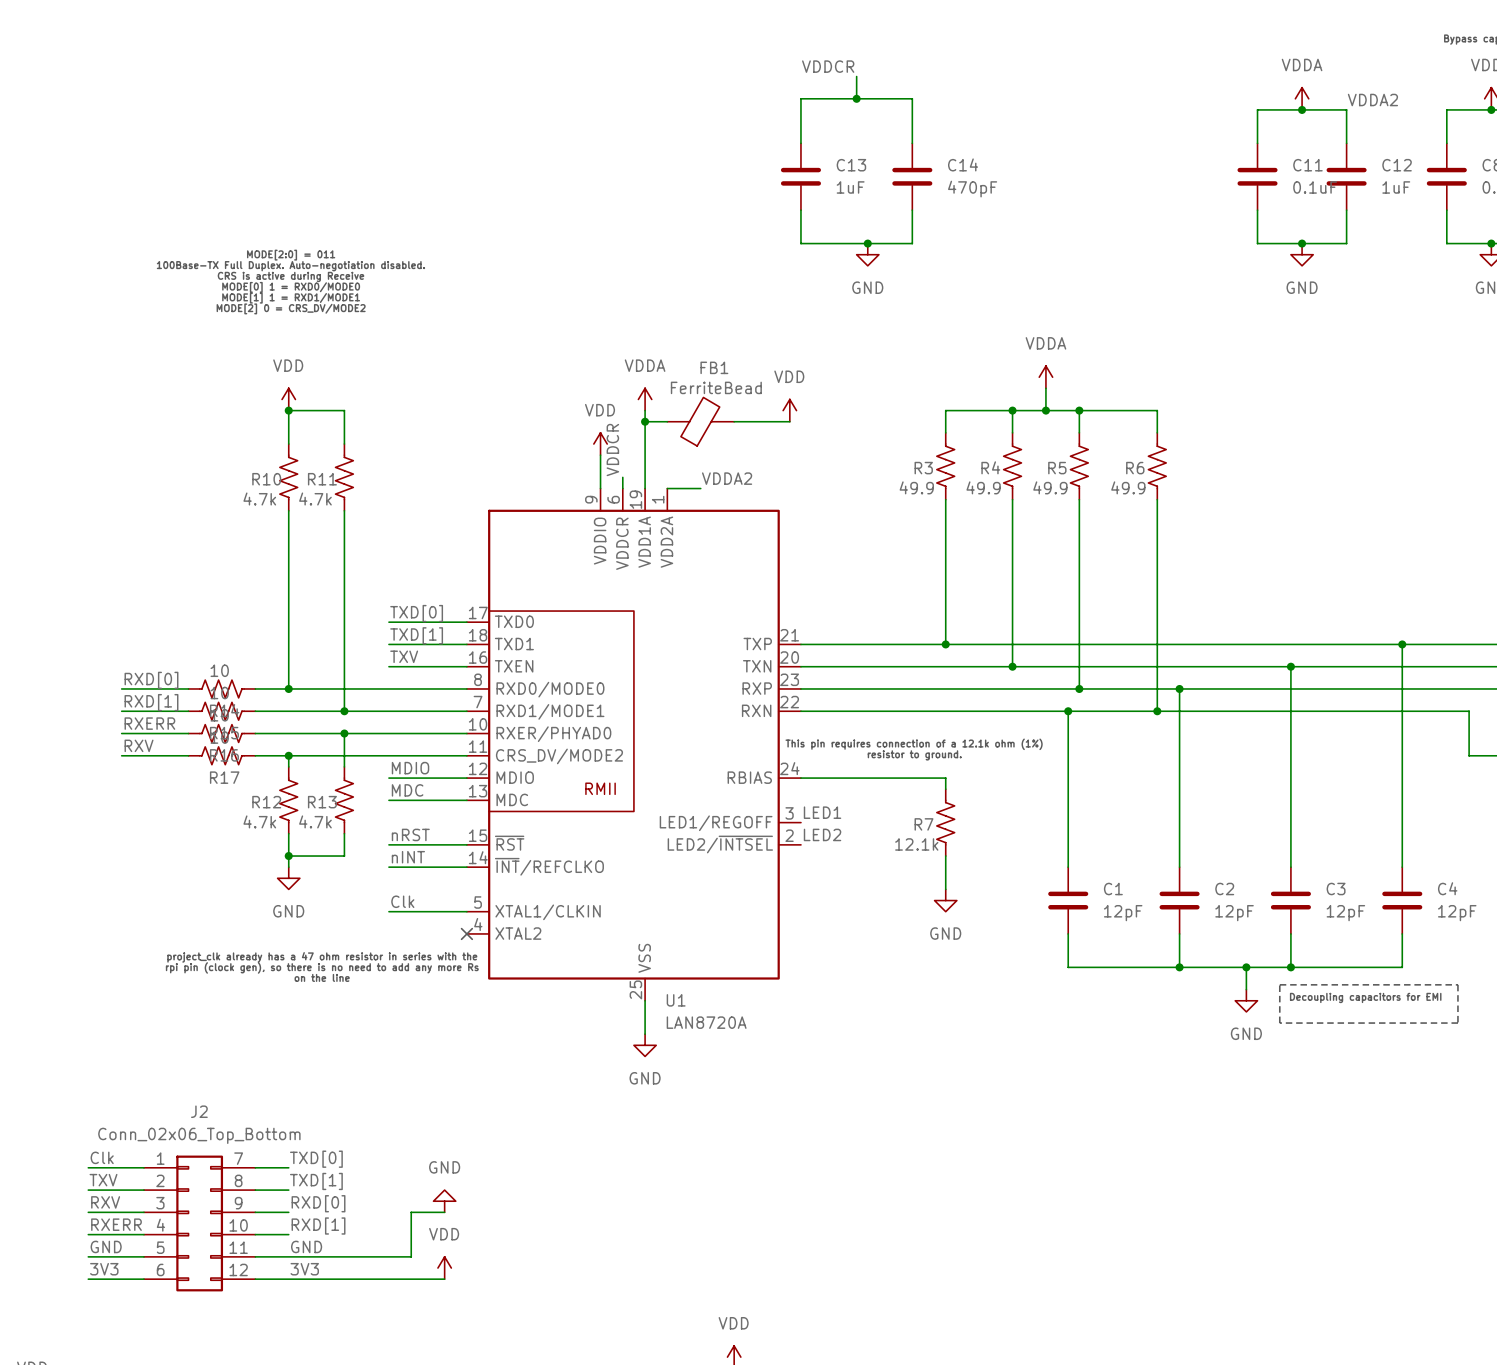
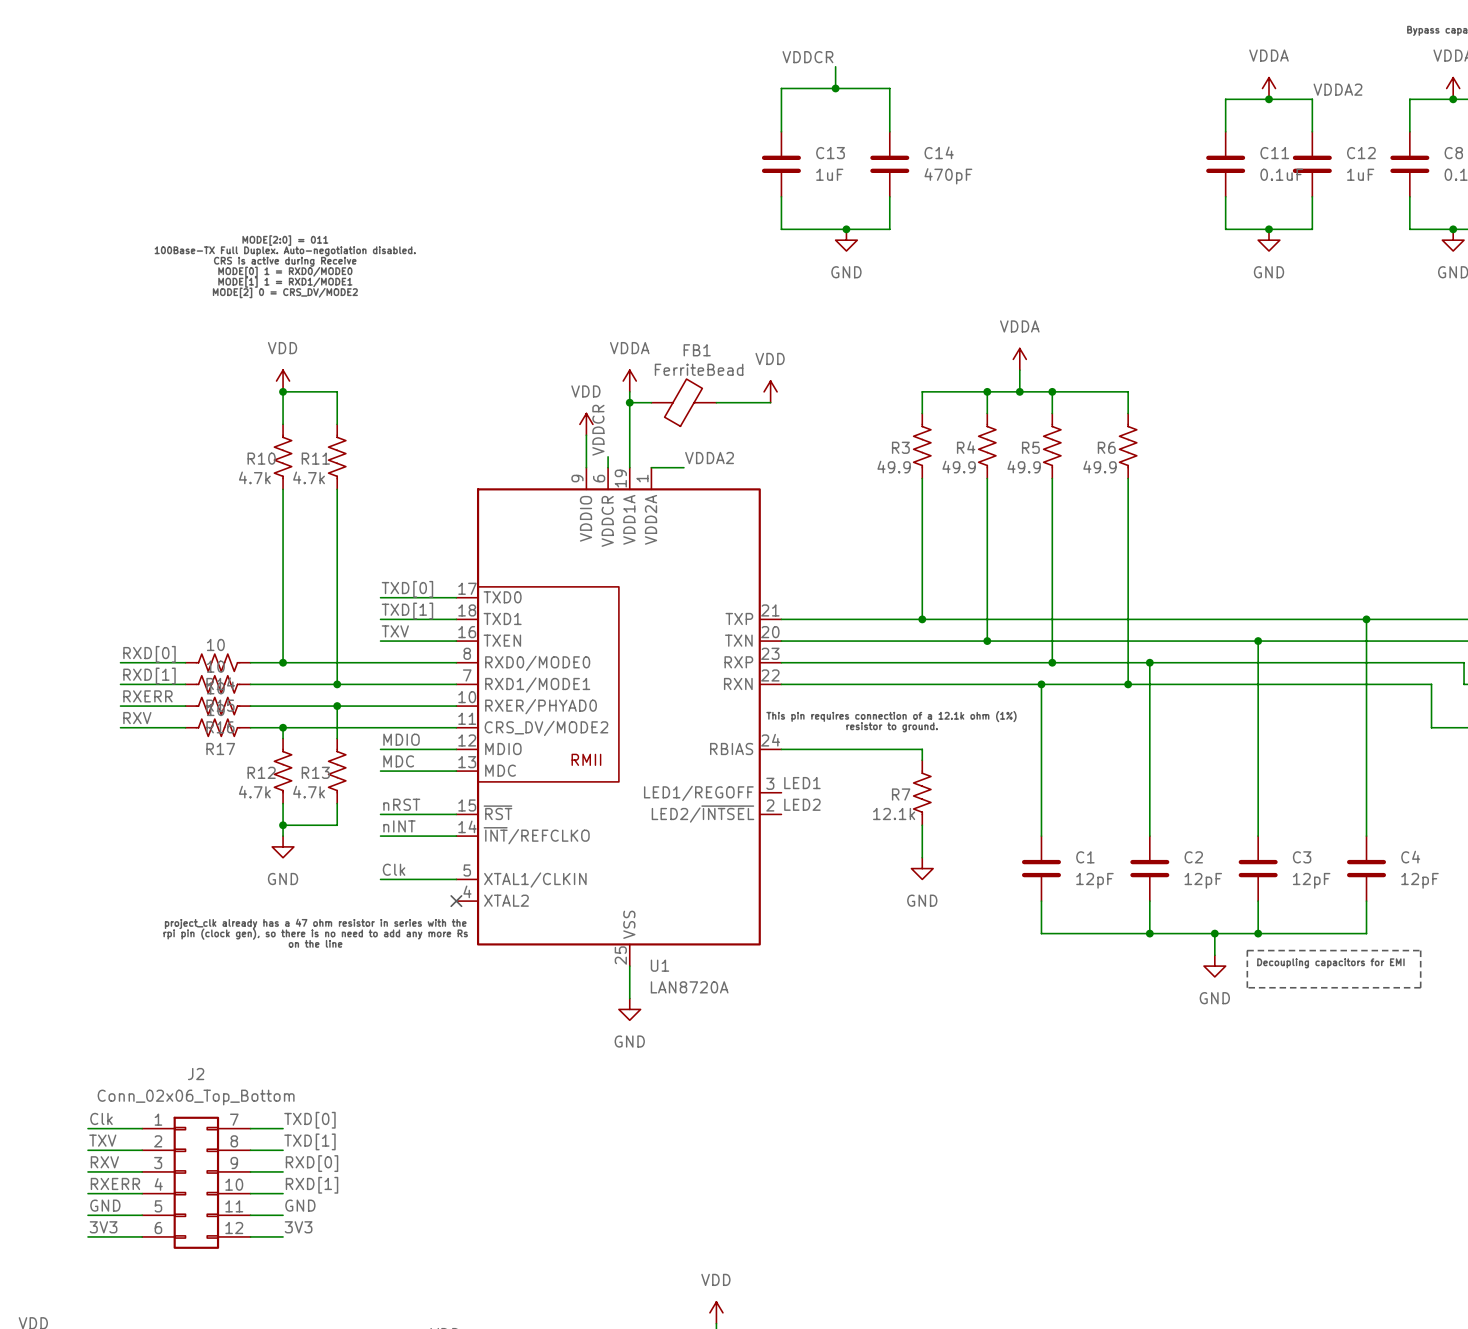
power symbol: GND (444, 1201) -> none
wire: (444, 1212) (411, 1212) (411, 1256) (288, 1256) -> none
power symbol: VDD (444, 1268) -> none
wire: (288, 1279) (444, 1279) -> none

